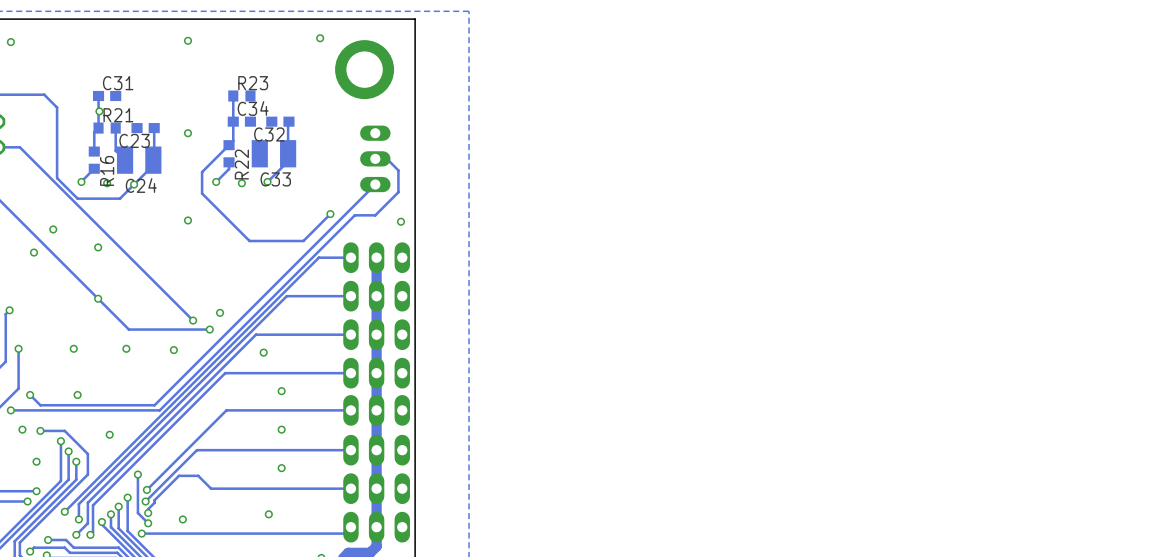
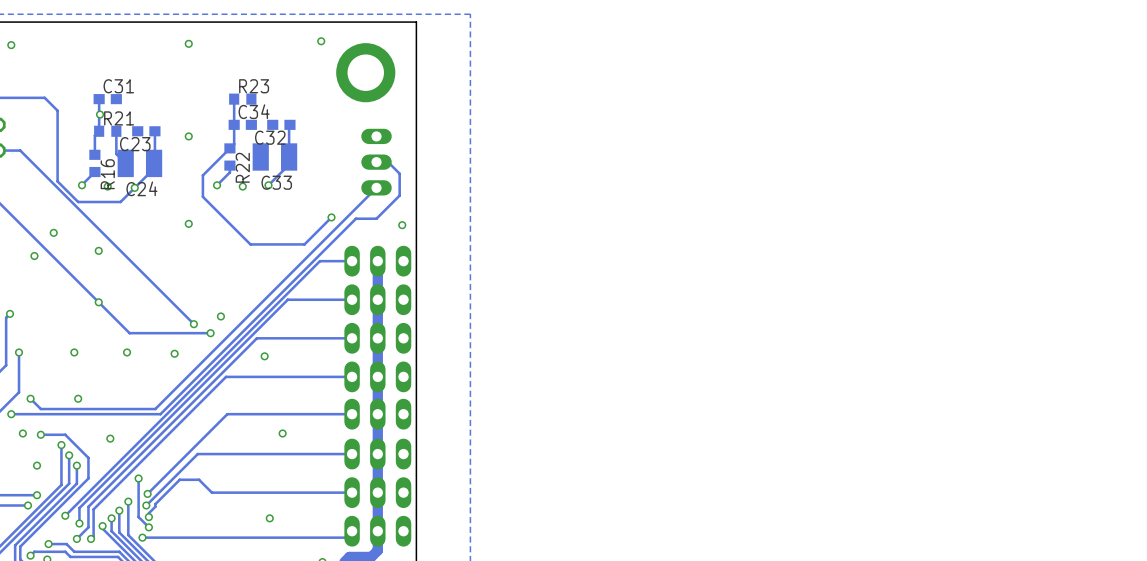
via: (281, 391) -> none
via: (281, 468) -> none
via: (182, 519) -> none

